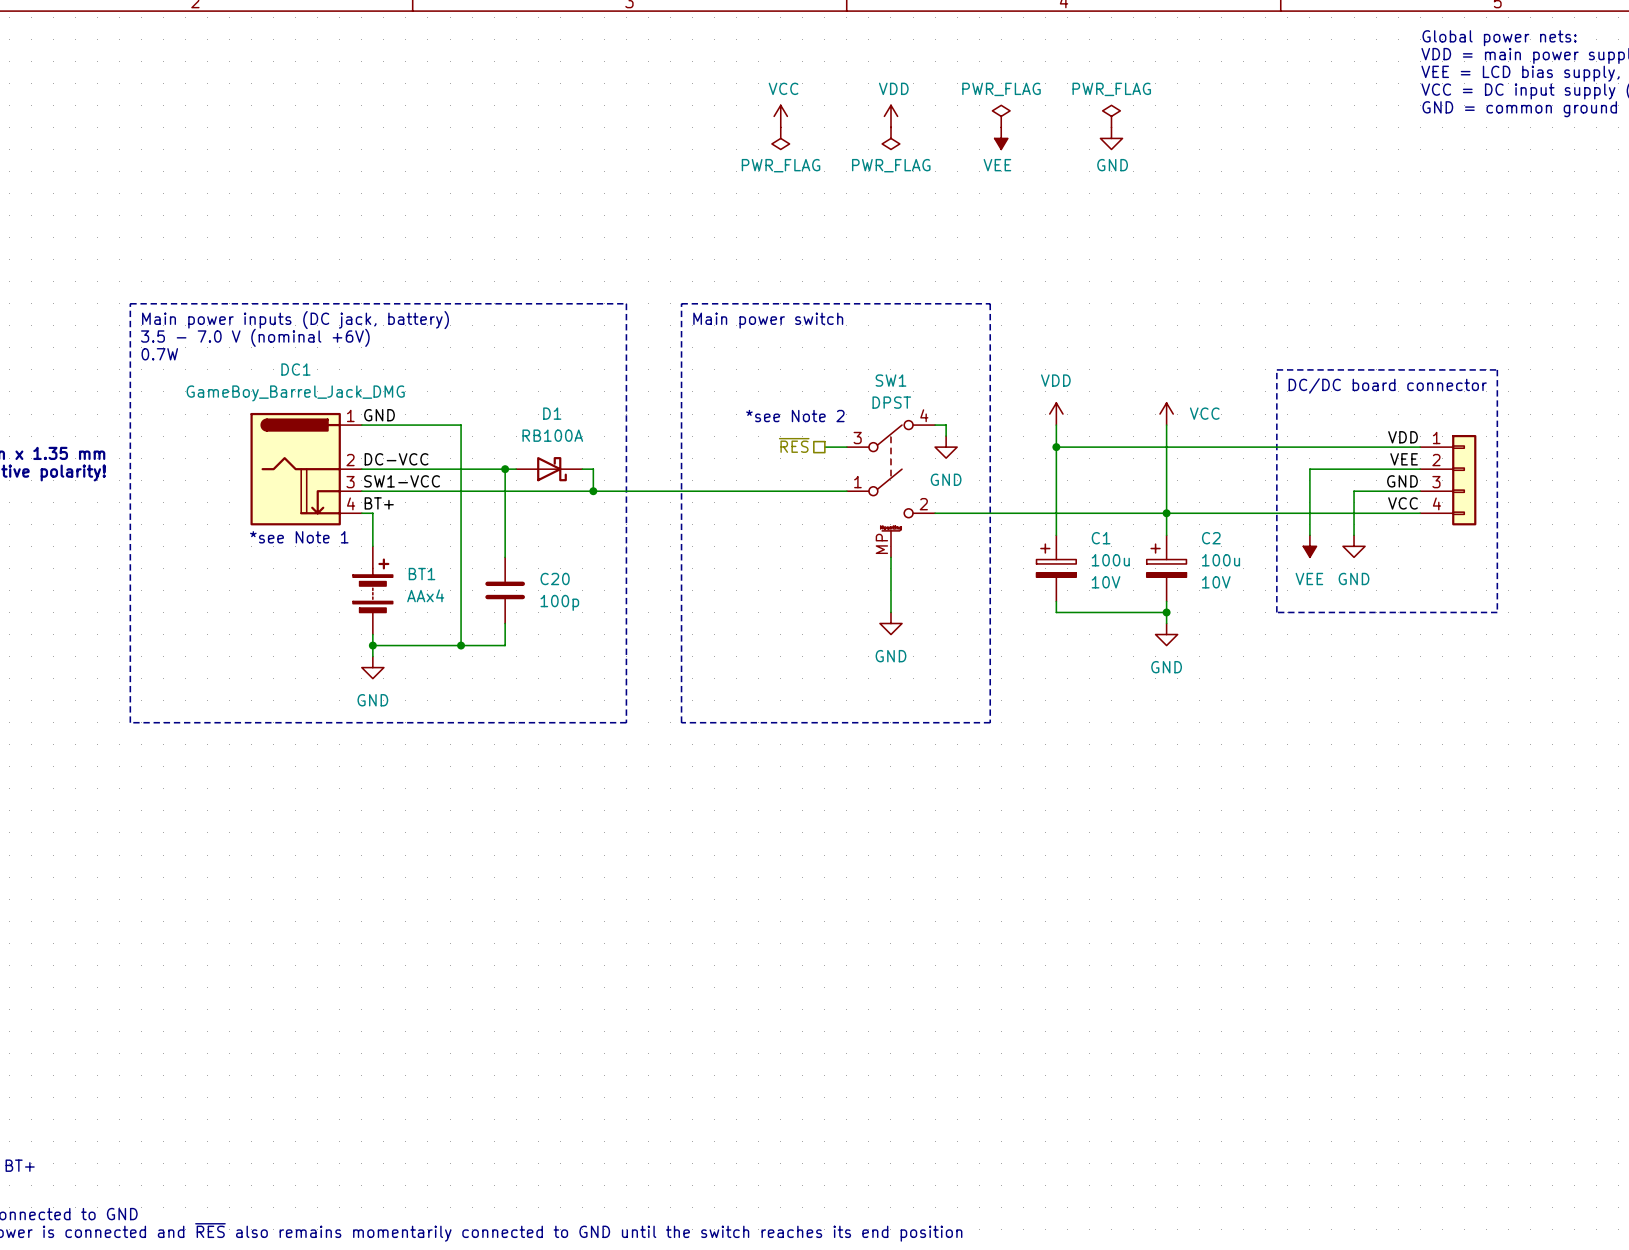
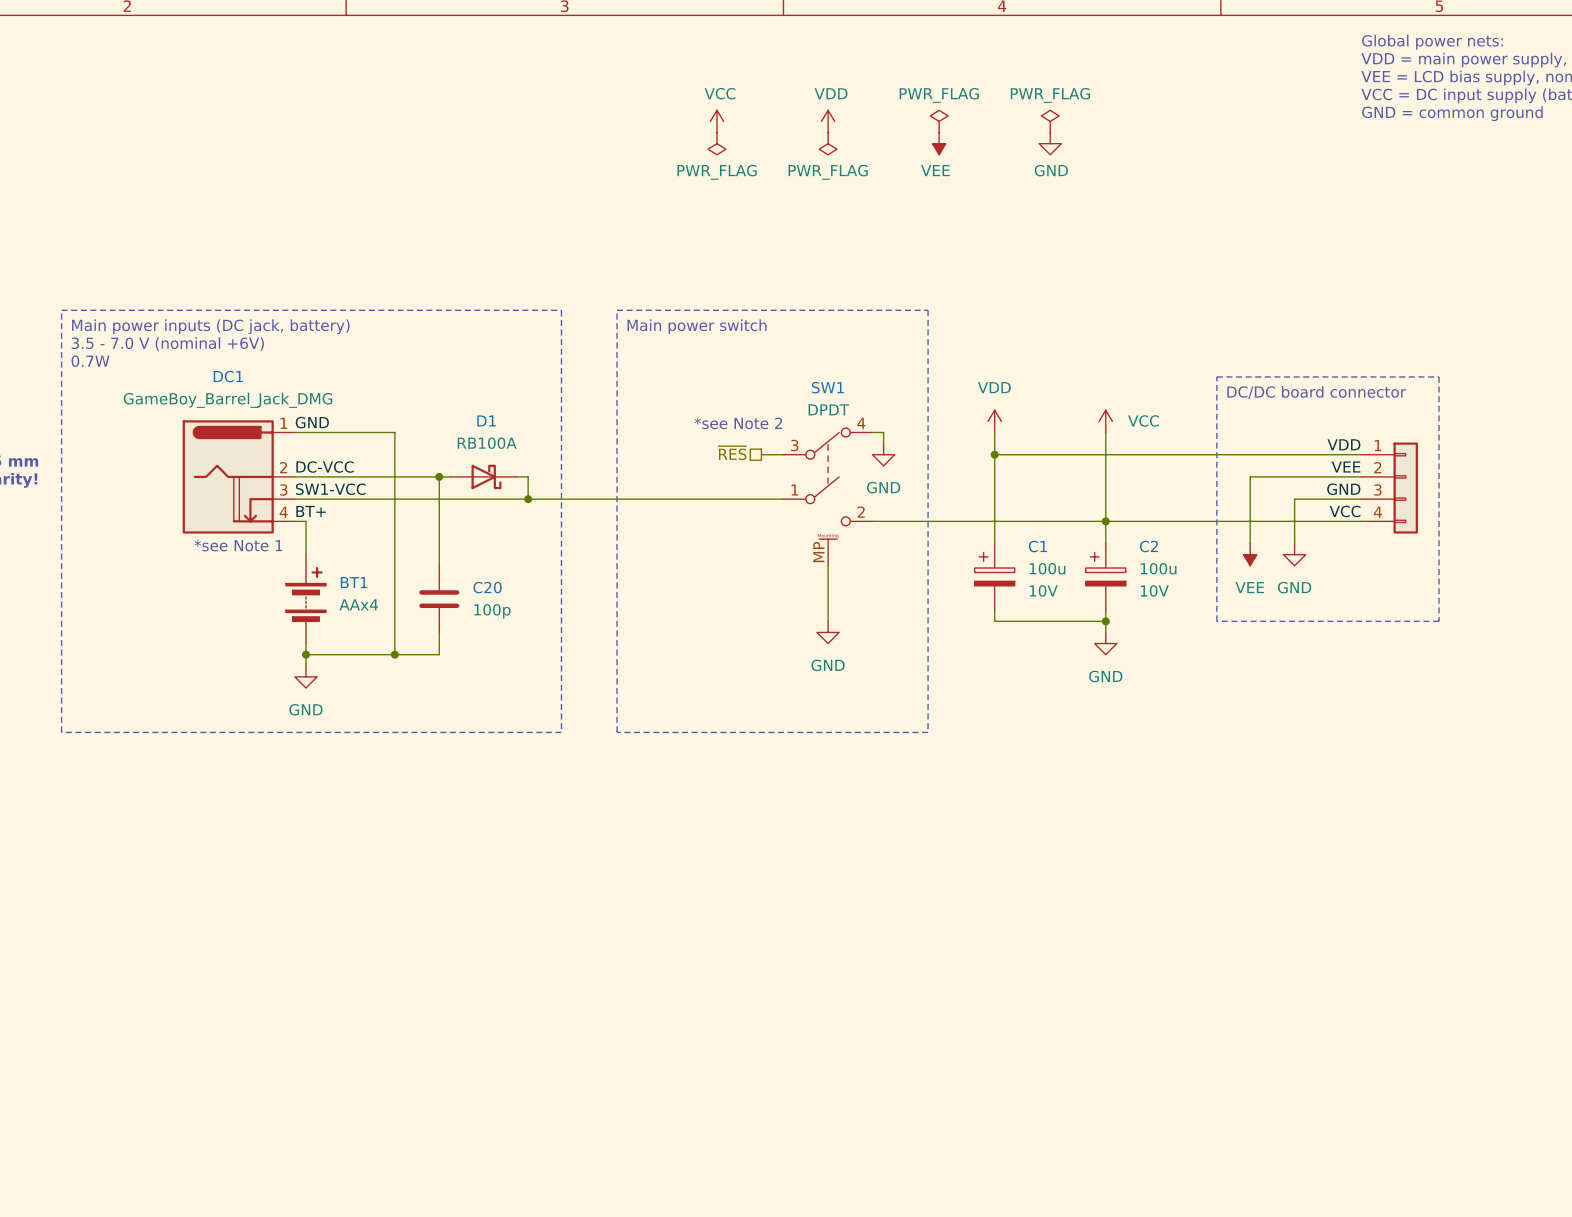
SW1 value: DPST (891, 402) -> DPDT (828, 409)

